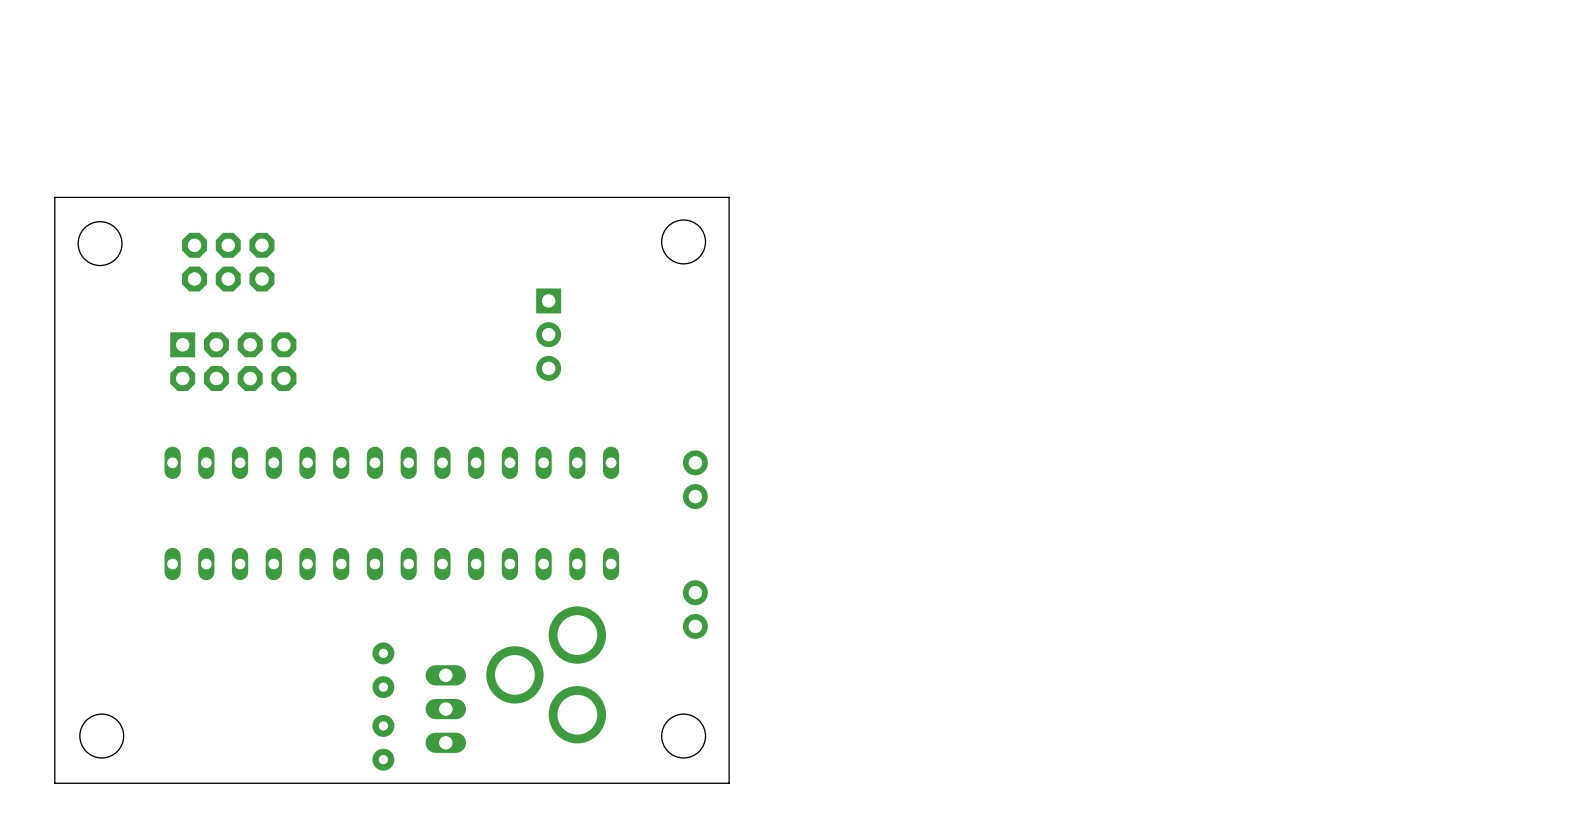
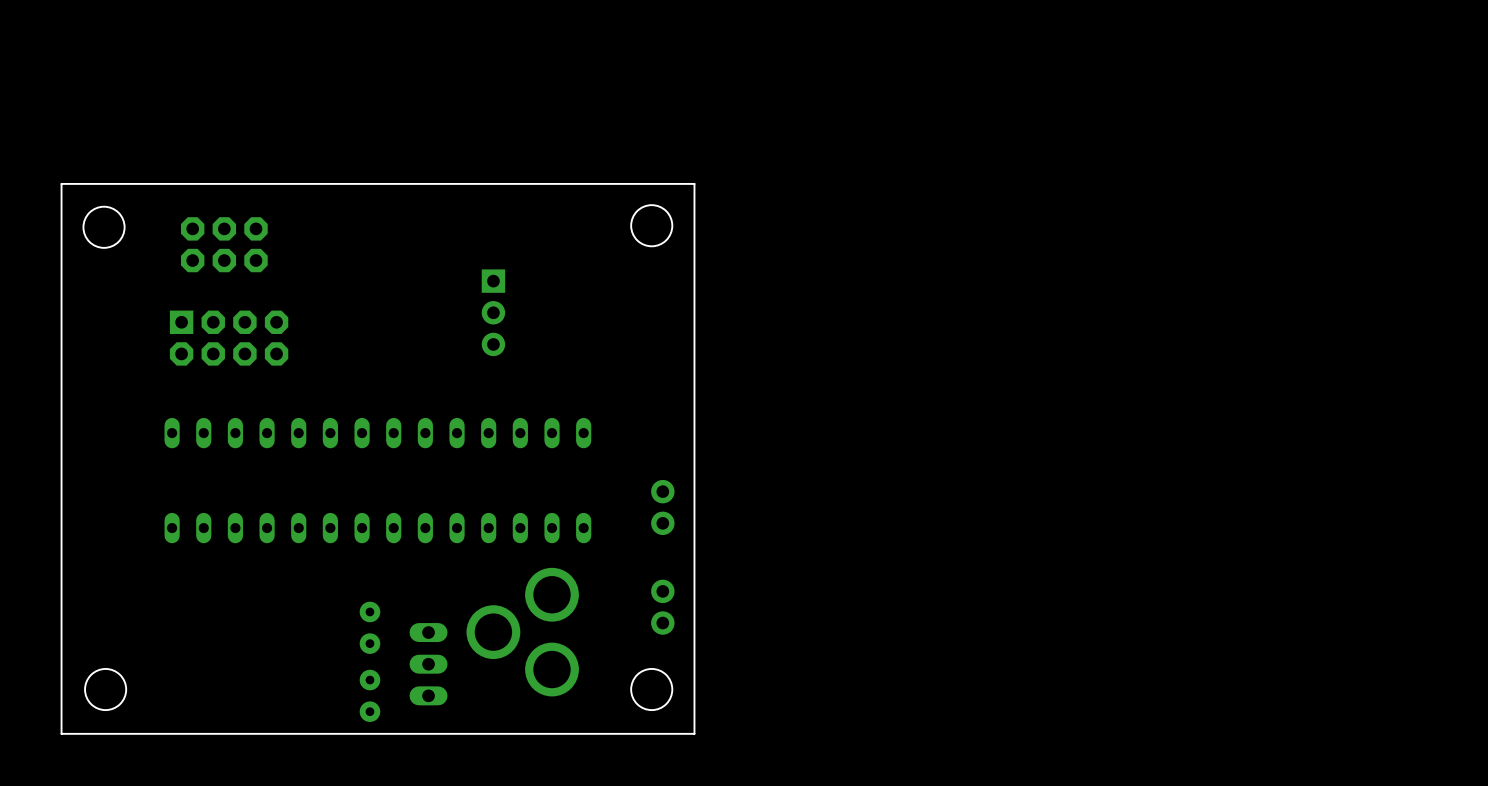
part position: (548, 334) -> (493, 312)
part: (695, 479) -> none
part: none -> (662, 507)
part: (695, 609) -> none
part: none -> (662, 607)

